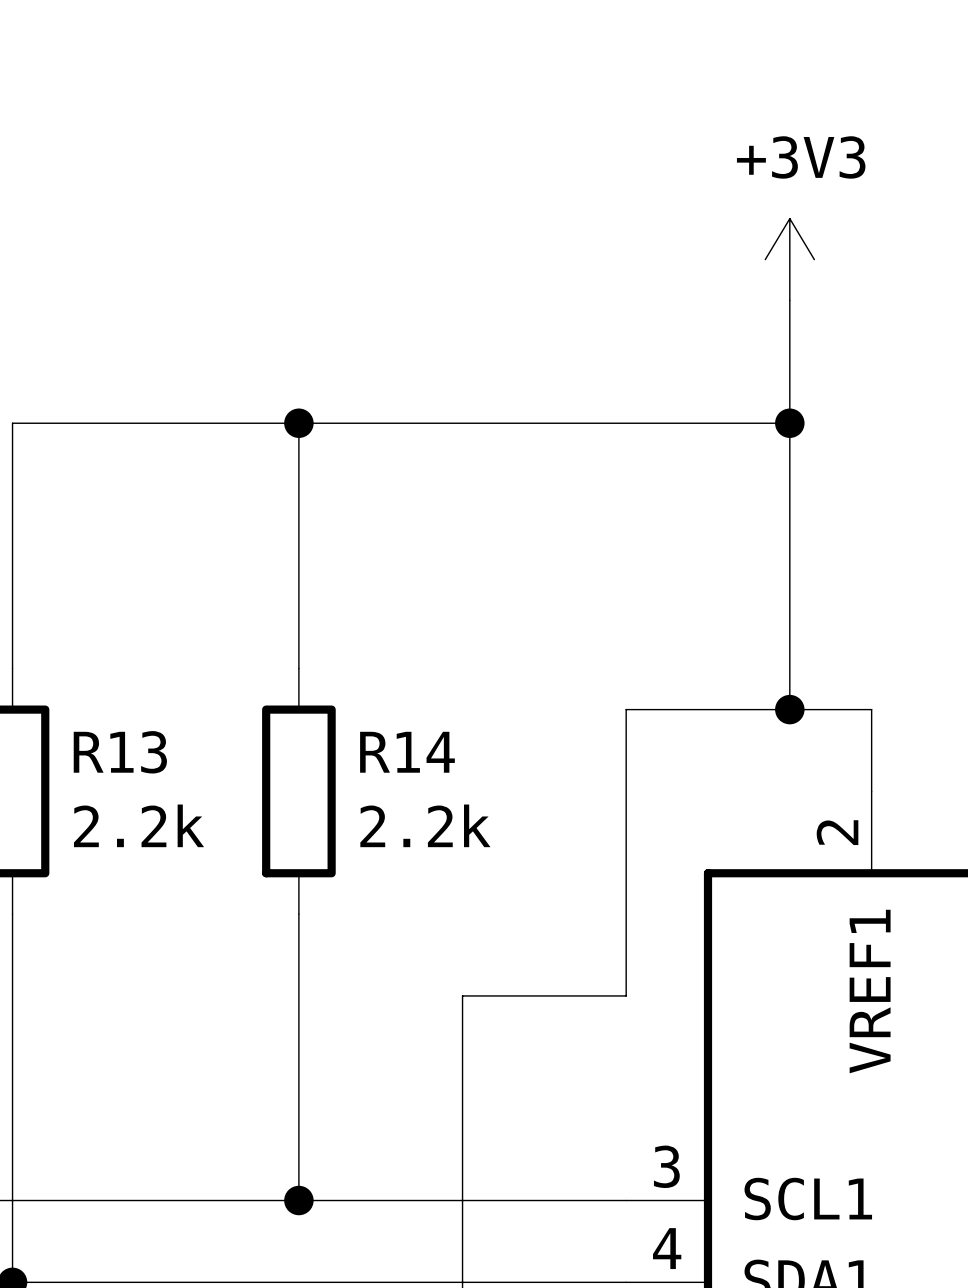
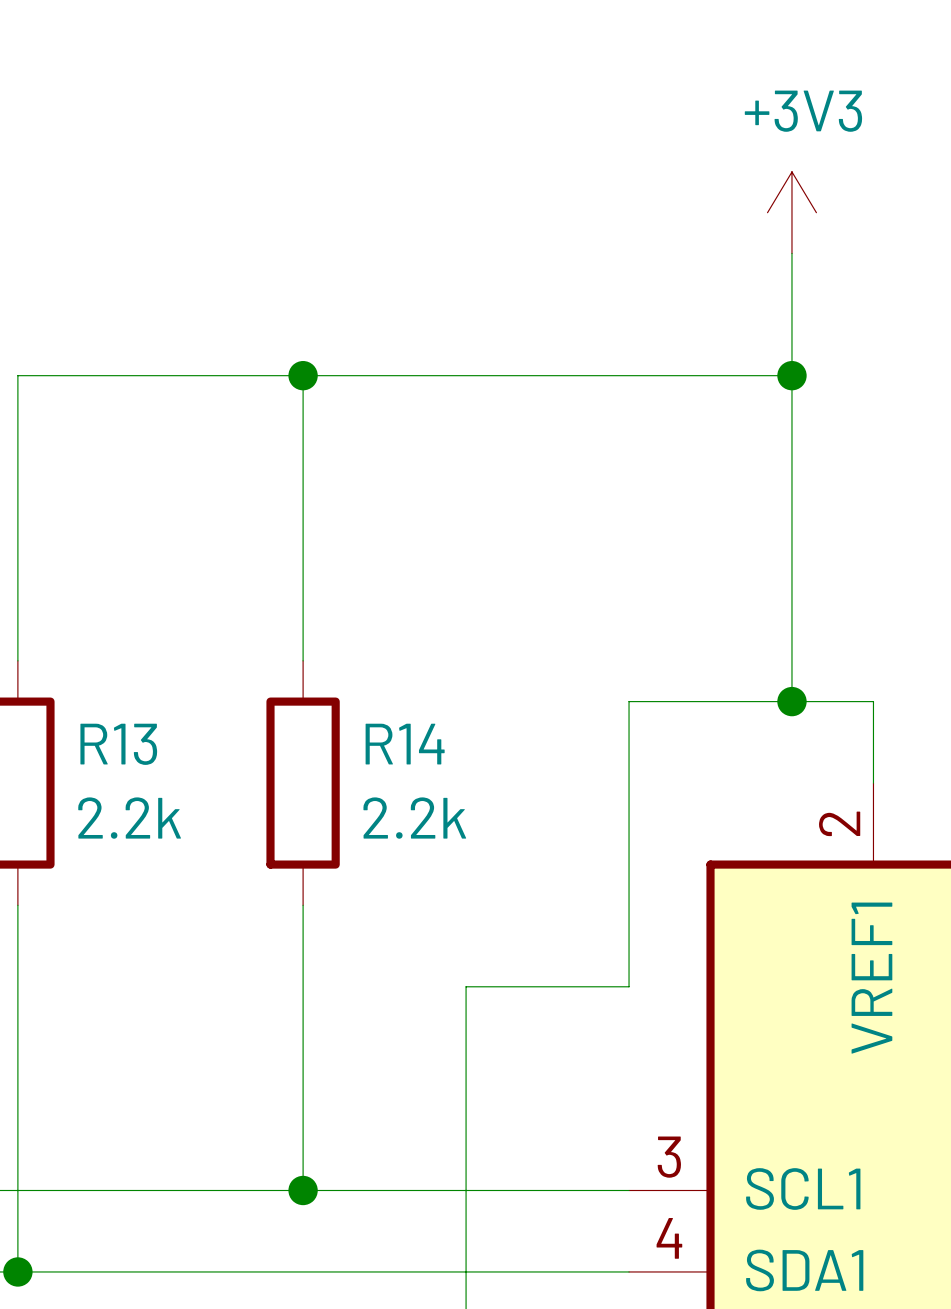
power symbol position: +3V3 (789, 259) -> +3V3 (791, 212)
wire: none -> (303, 375) (303, 416)
wire: (12, 423) (789, 423) -> (17, 416) (17, 375) (791, 375)
junction position: (298, 423) -> (303, 375)
junction position: (789, 423) -> (791, 375)

